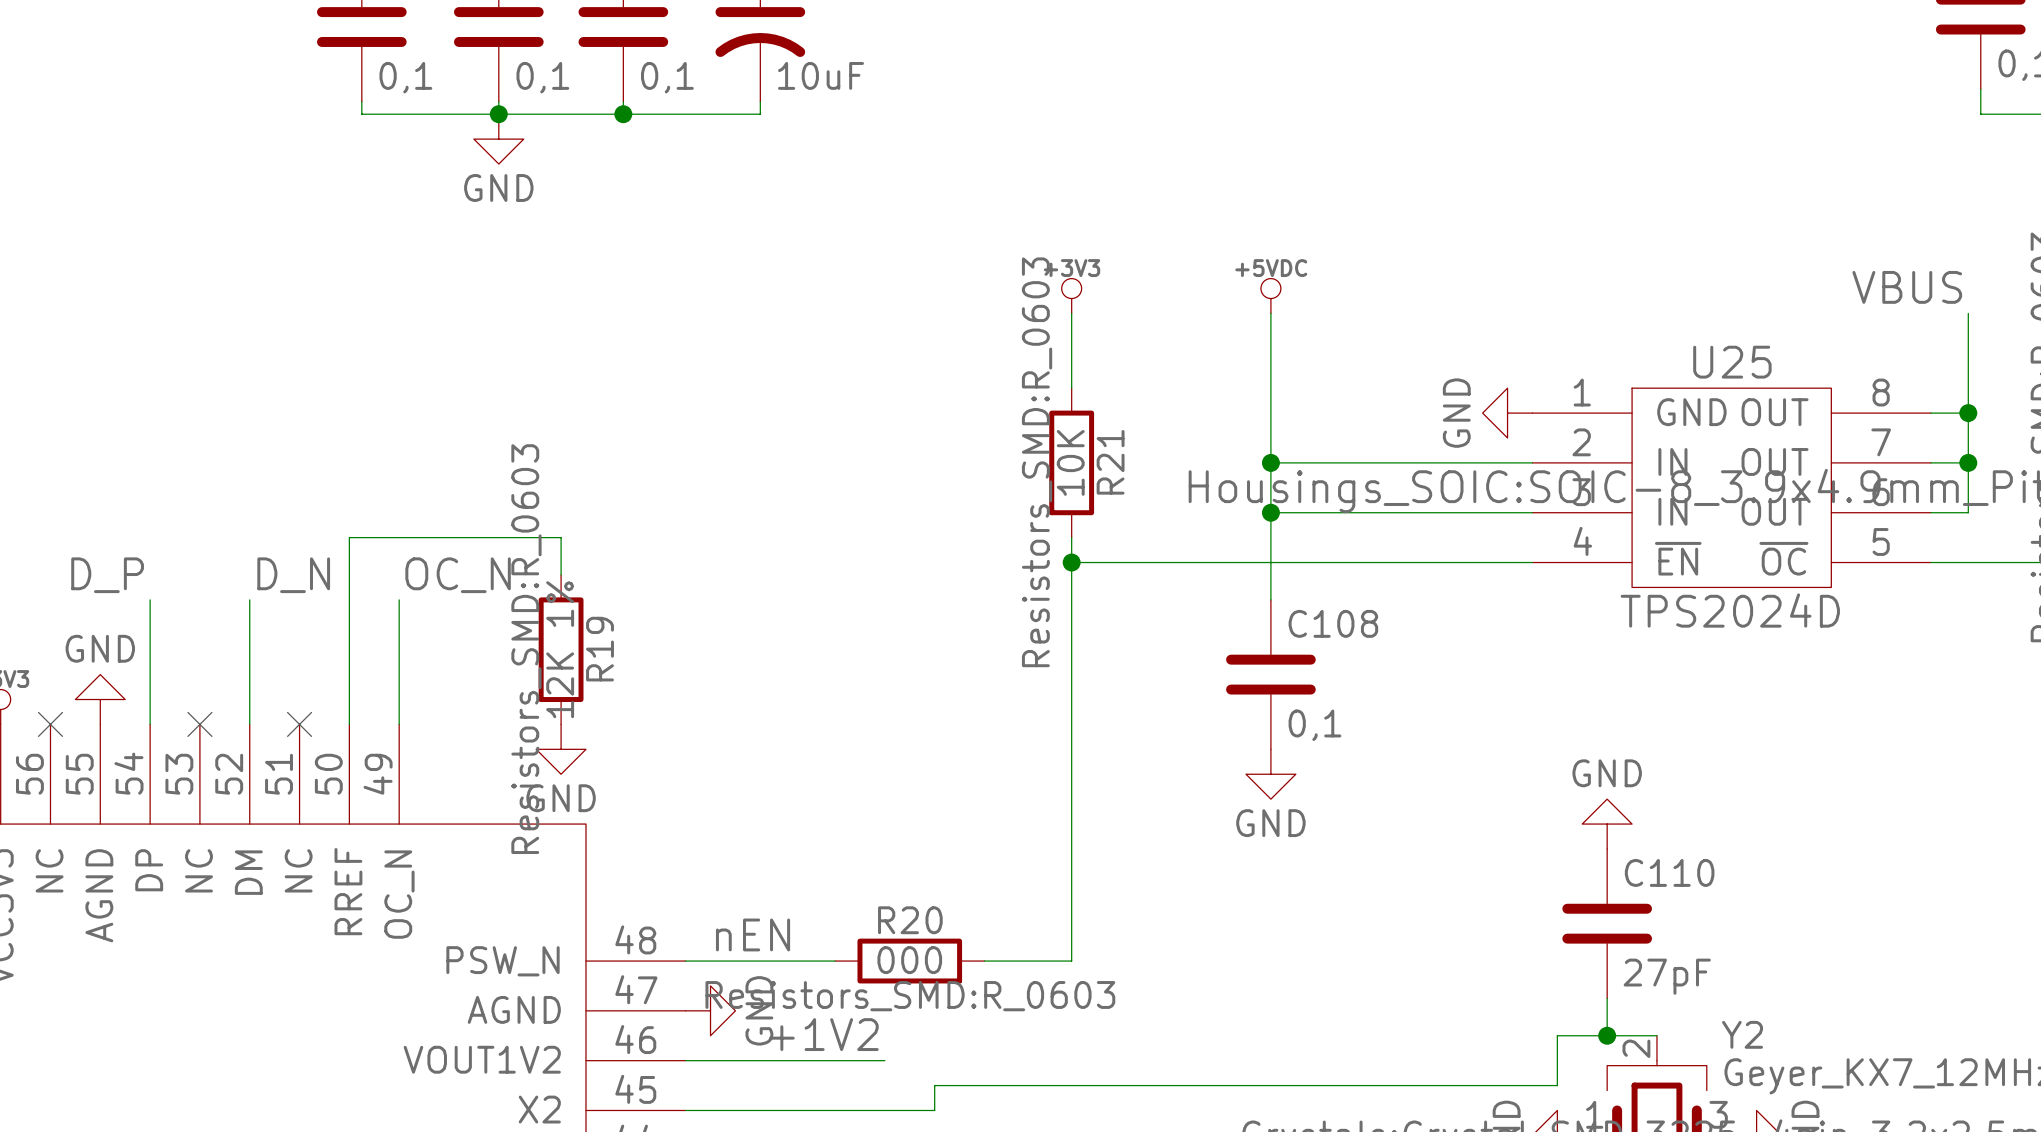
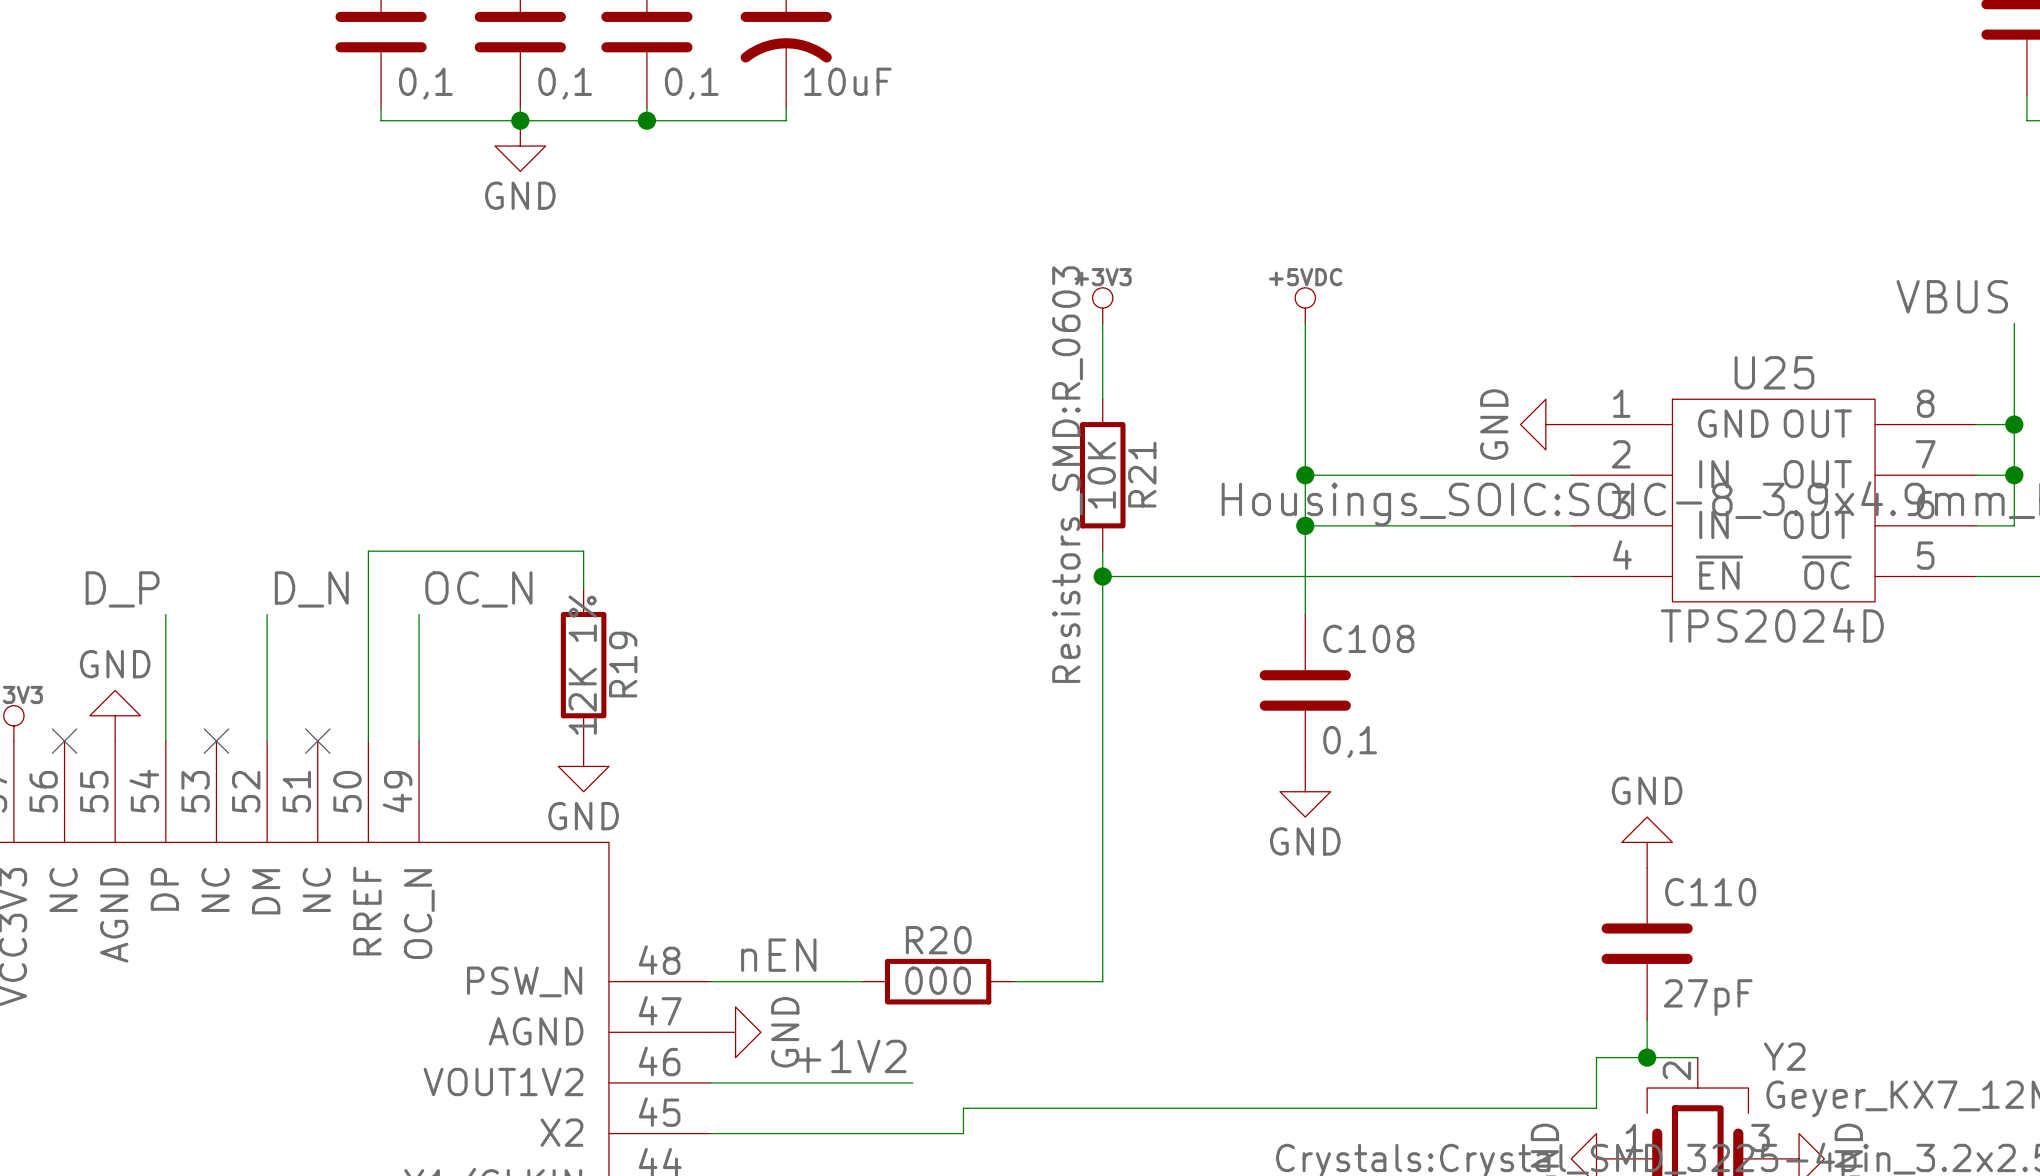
R19 text: Resistors_SMD:R_0603 (526, 649) -> none
R20 text: Resistors_SMD:R_0603 (910, 996) -> none

